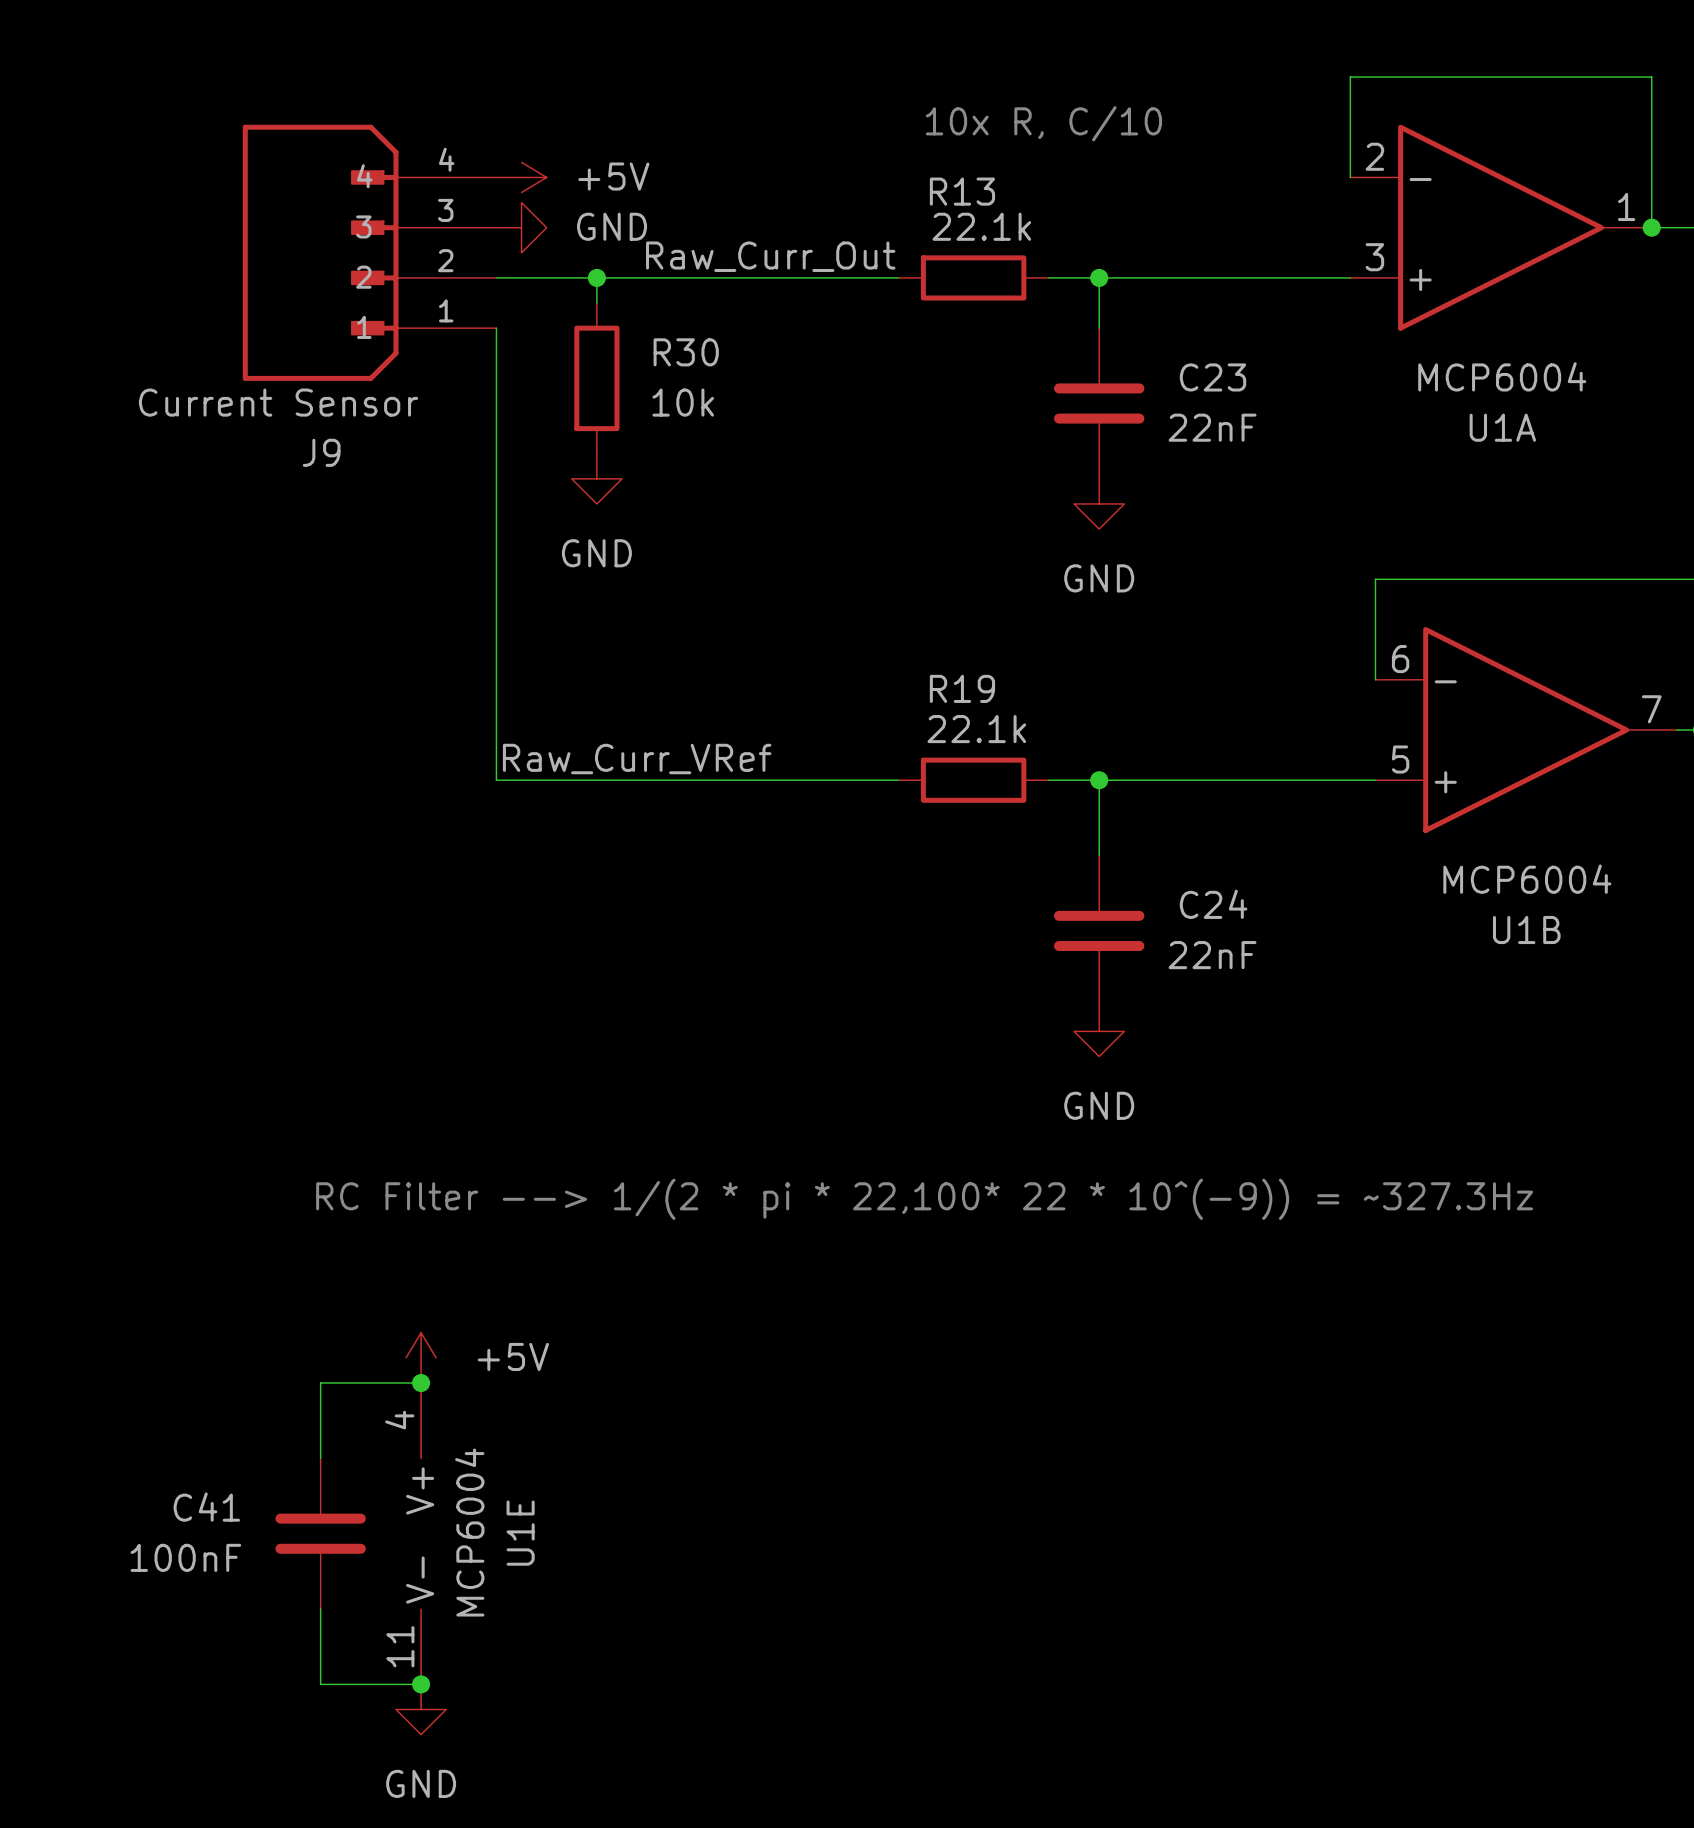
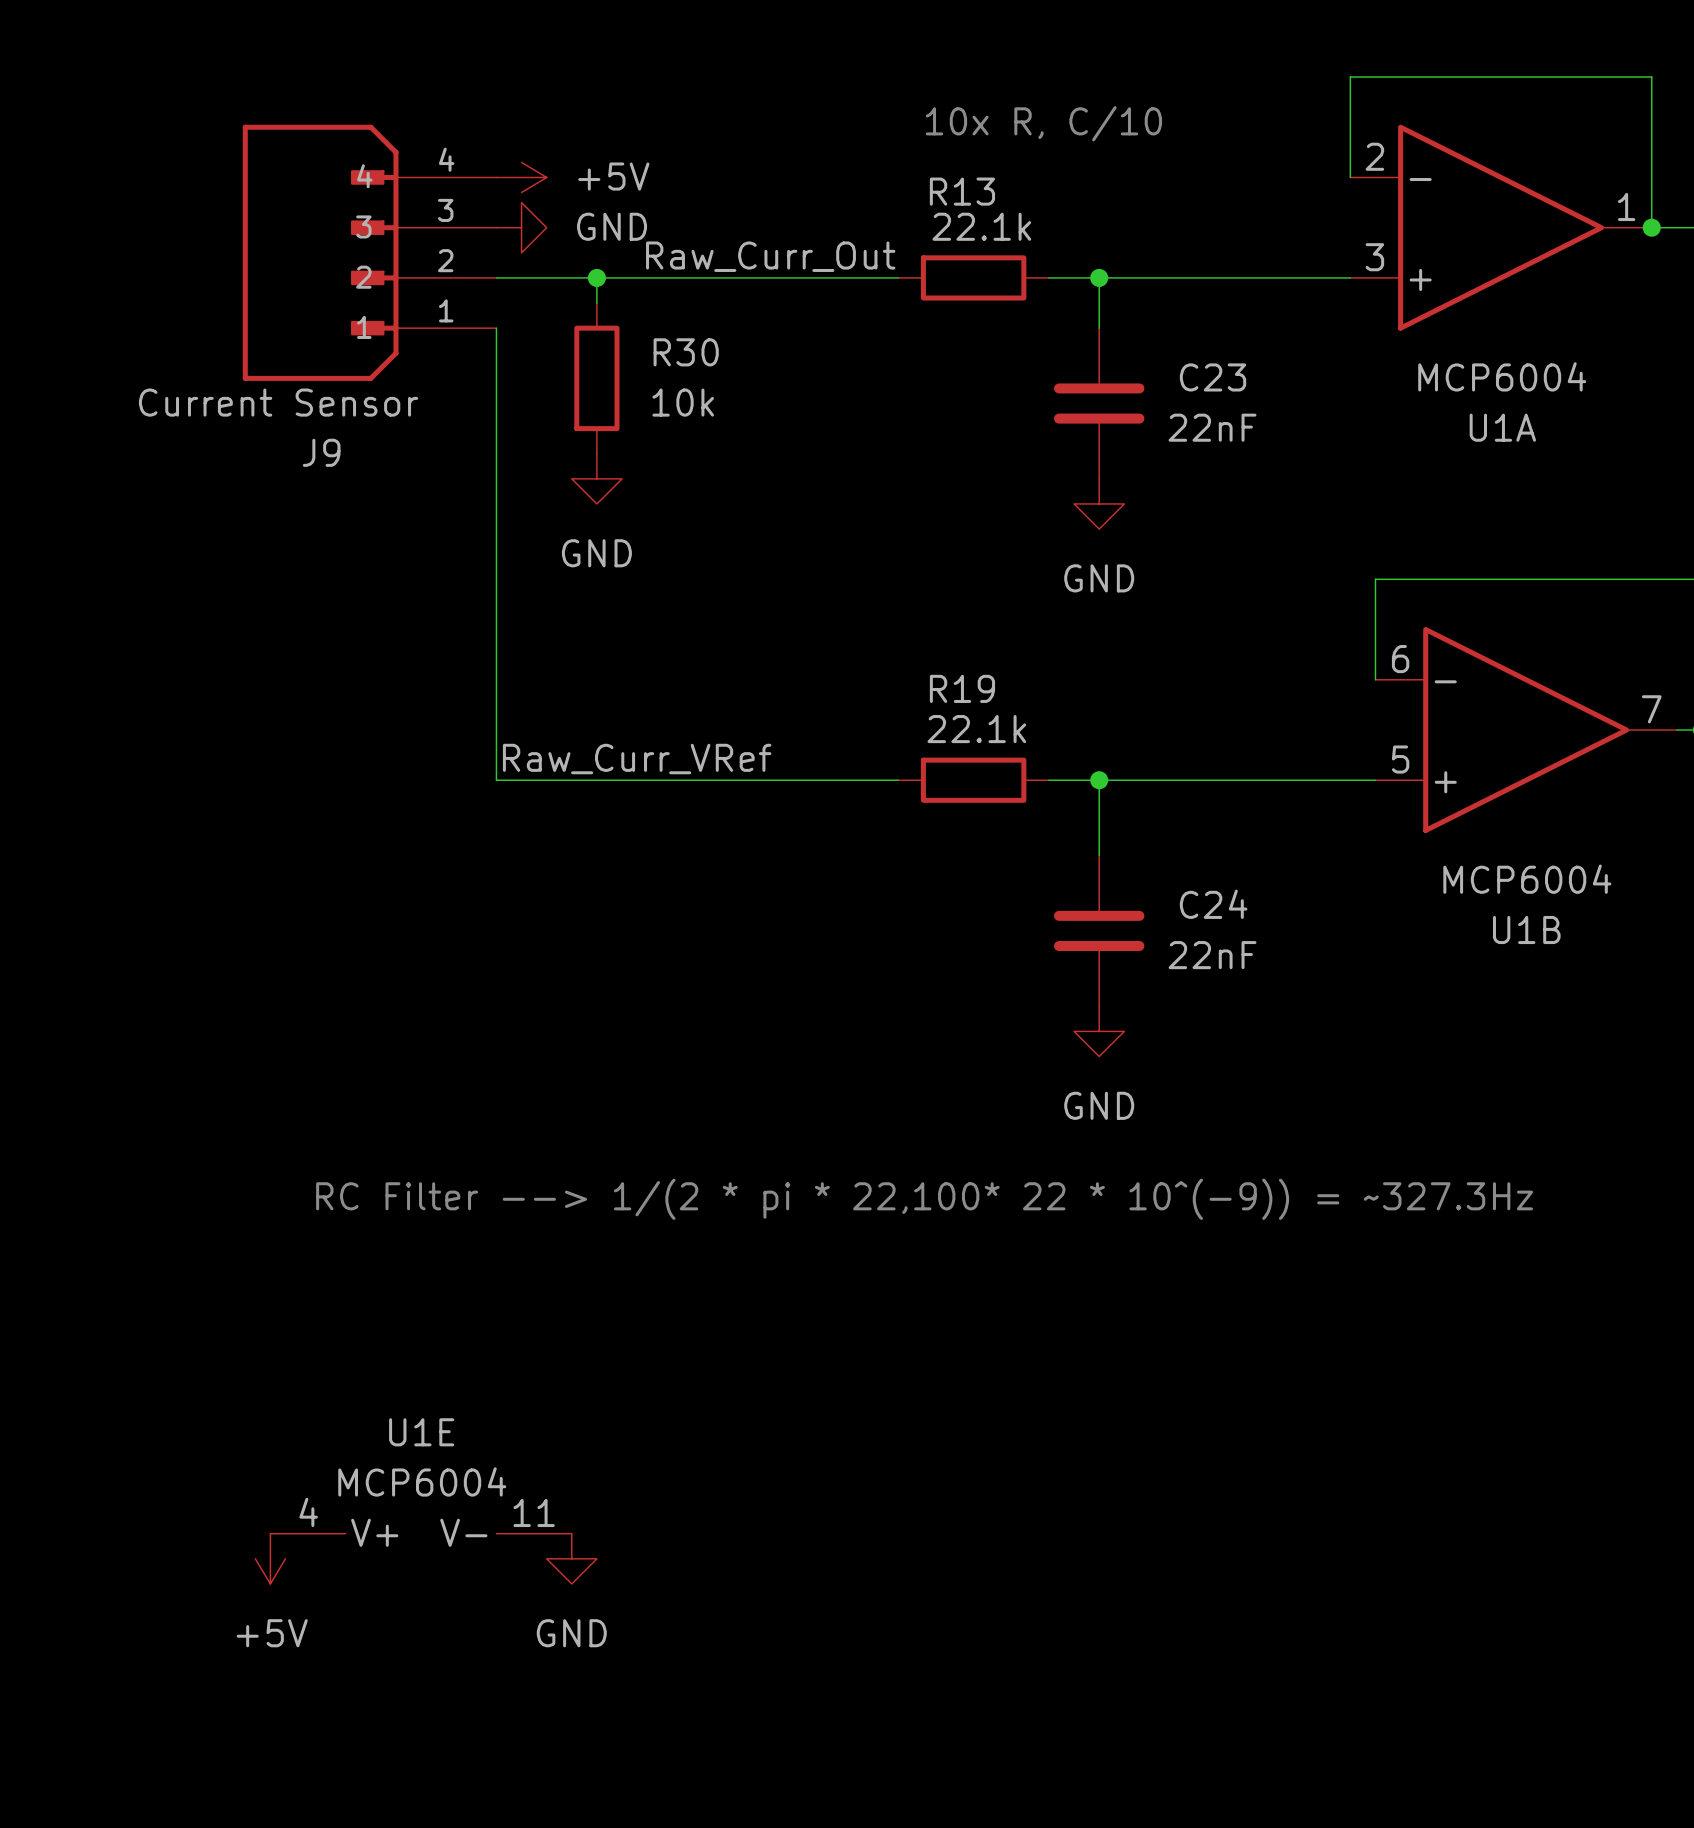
power symbol text position: +5V (513, 1356) -> +5V (272, 1633)
power symbol rotation: 0° (421, 1357) -> 180° (270, 1558)
power symbol position: +5V (421, 1357) -> +5V (270, 1558)
wire: (421, 1383) (320, 1383) (320, 1458) -> none
junction: (421, 1383) -> none
C41: 100nF (320, 1533) -> none
U1E rotation: 0° (421, 1533) -> 90° counterclockwise (421, 1533)
wire: (320, 1609) (320, 1684) (421, 1684) -> none
junction: (421, 1684) -> none
power symbol position: GND (421, 1709) -> GND (571, 1558)

